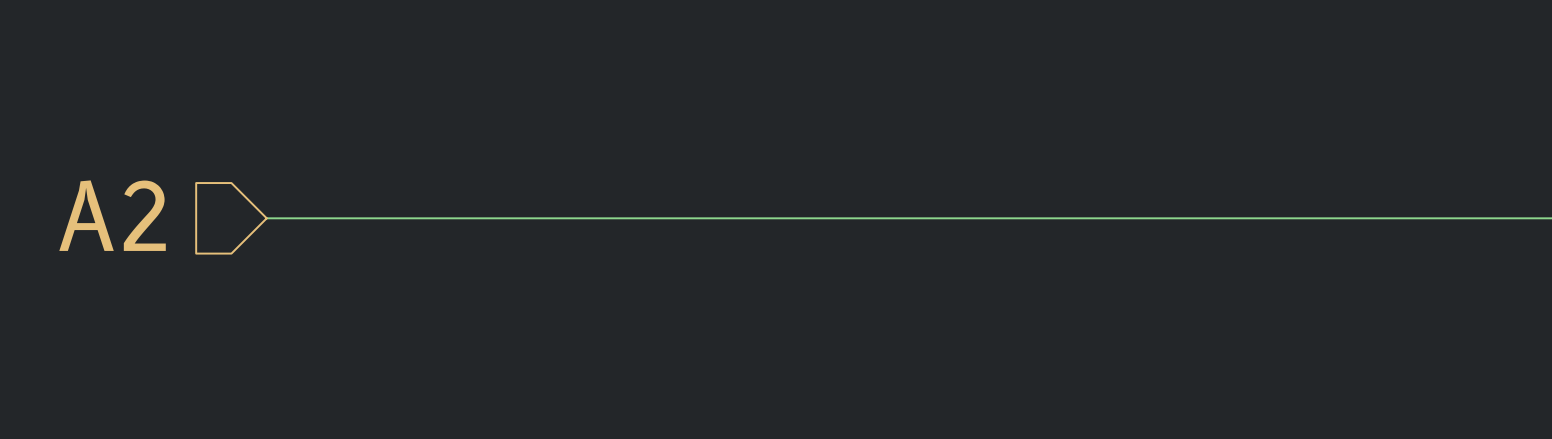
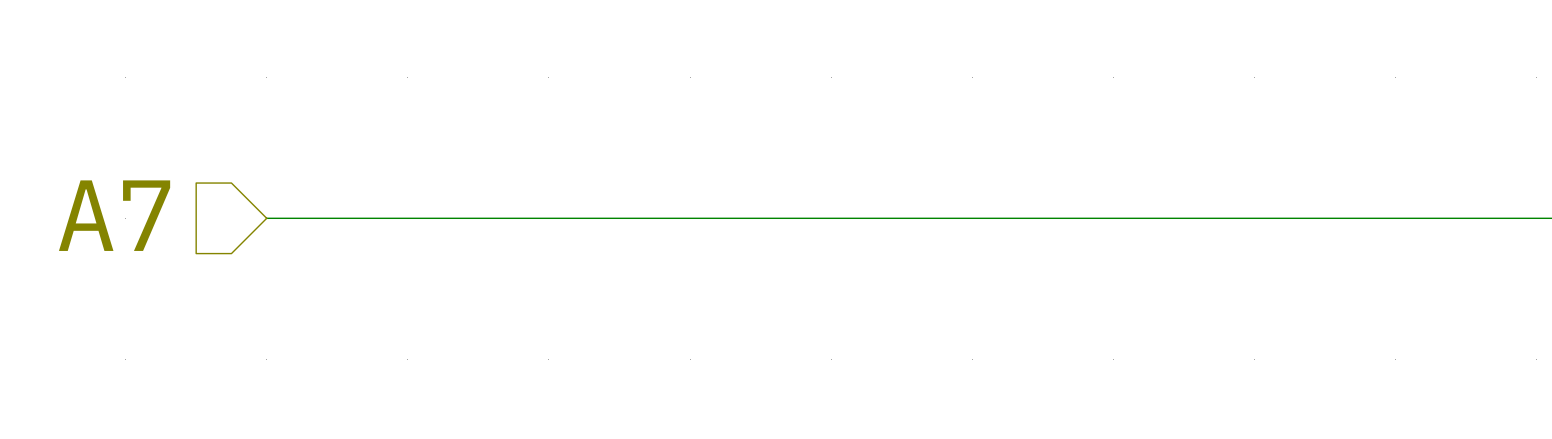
hierarchical label: A2 (112, 215) -> A7 (114, 215)

